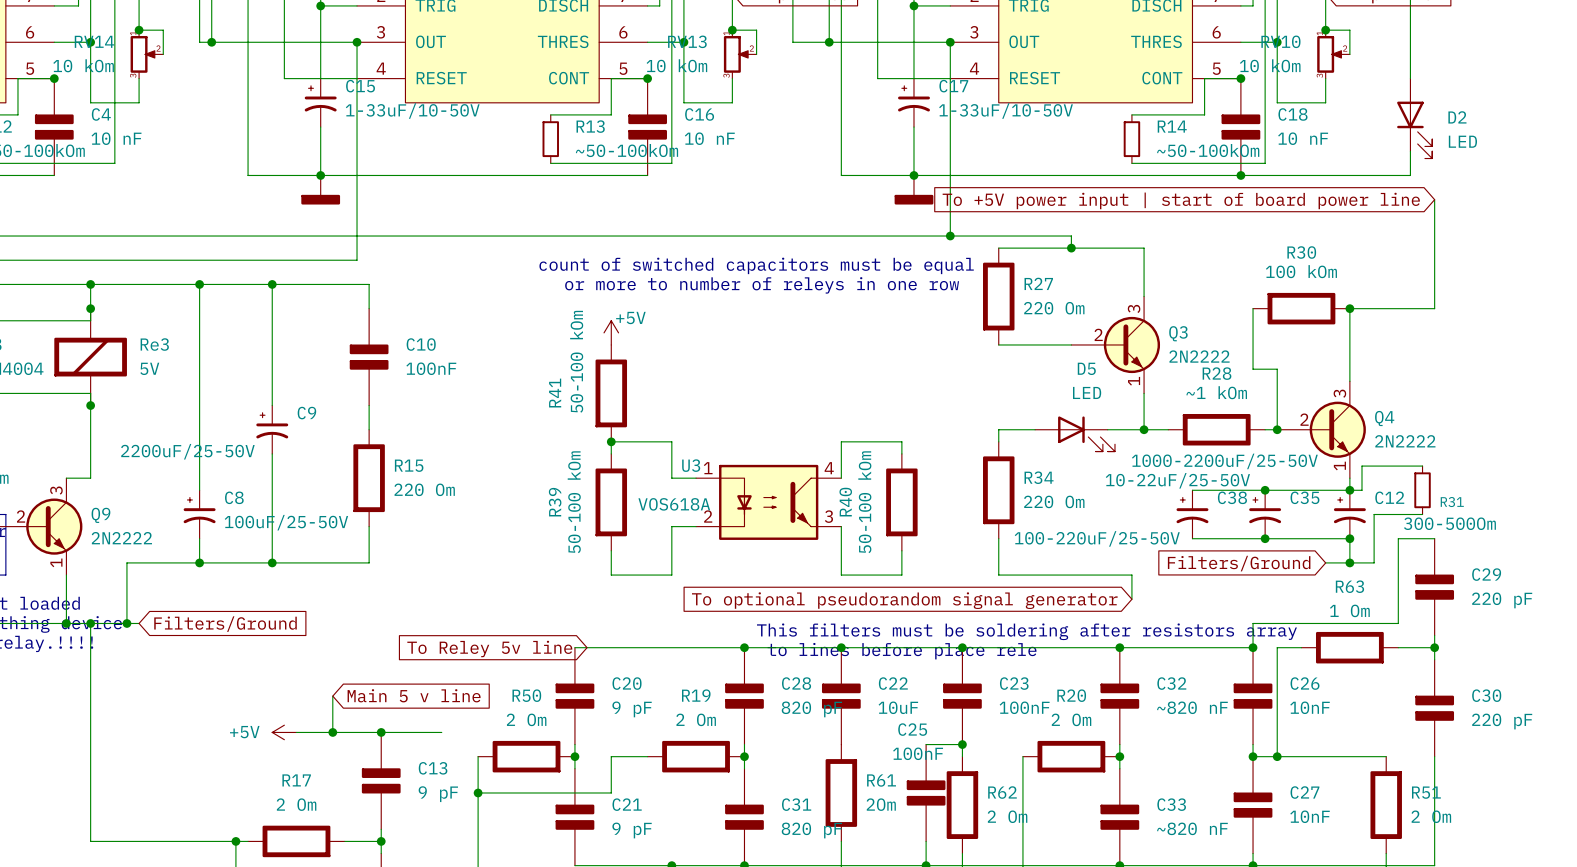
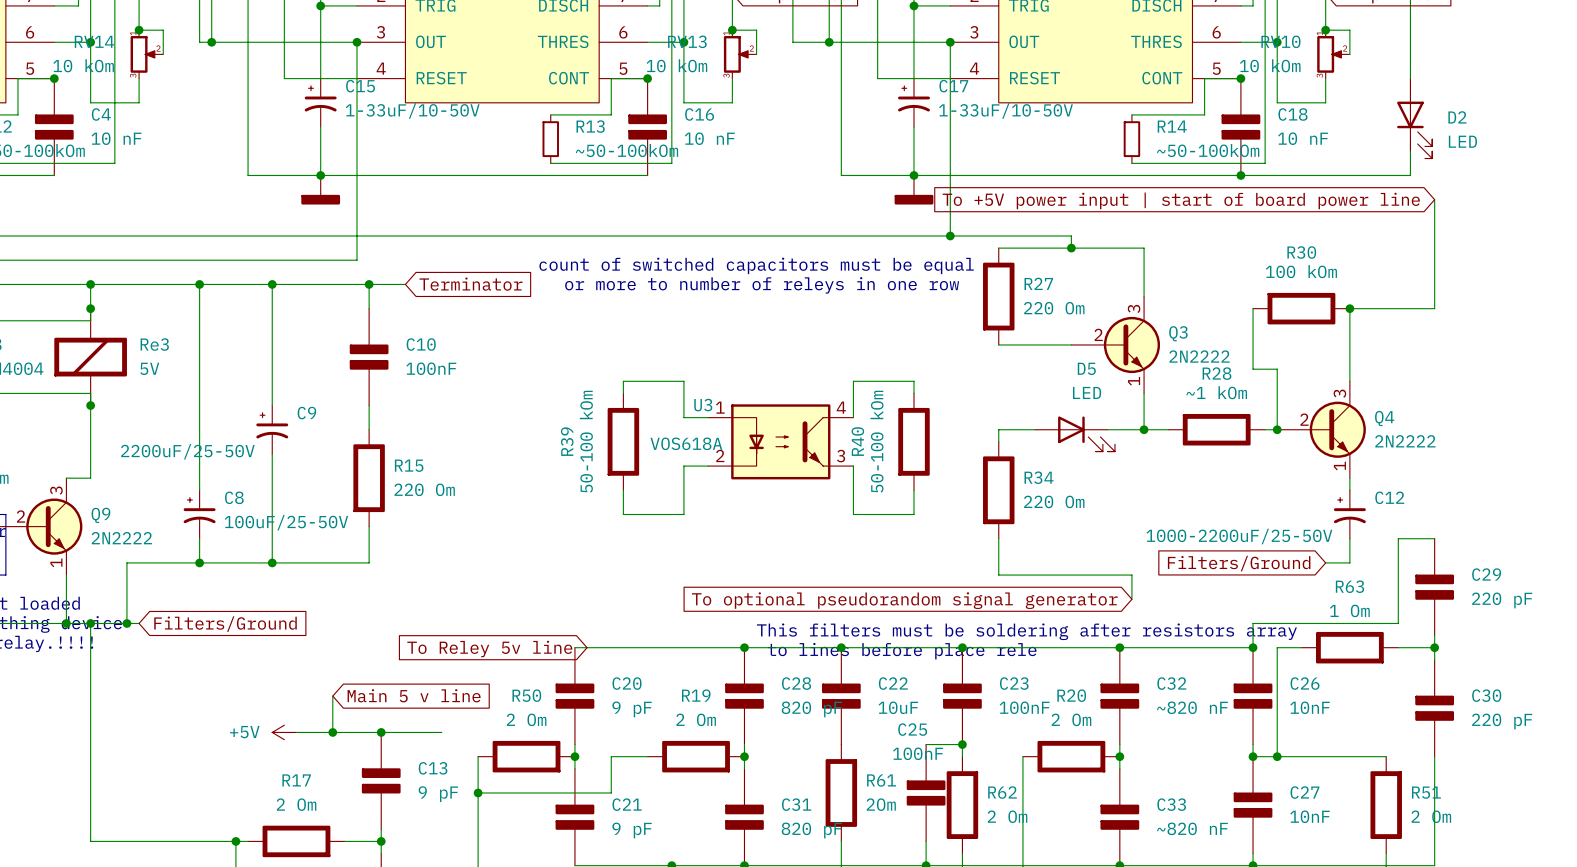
wire: none -> (369, 284) (405, 284)
junction: none -> (369, 284)
global label: none -> Terminator (470, 284)
power symbol: +5V (611, 332) -> none
R41: 50-100 kOm (611, 393) -> none
junction: (611, 441) -> none
wire: (611, 453) (611, 441) (671, 441) (671, 478) (696, 478) -> (623, 393) (623, 381) (683, 381) (683, 417) (708, 417)
wire: (901, 453) (901, 441) (841, 441) (841, 478) -> (913, 393) (913, 381) (853, 381) (853, 417)
C12 text position: 1000-2200uF/25-50V (1224, 461) -> 1000-2200uF/25-50V (1239, 536)
wire: (1422, 466) (1361, 466) (1361, 490) (1192, 490) -> none
junction: (1265, 490) -> none
junction: (1349, 490) -> none
R31: 300-500Om (1422, 490) -> none
R39 position: (611, 502) -> (623, 441)
U3 position: (768, 502) -> (780, 441)
R40 position: (901, 502) -> (913, 441)
C38: (1192, 514) -> none
C35: (1265, 514) -> none
wire: (1422, 514) (1374, 514) (1374, 562) (1349, 562) -> none
wire: (696, 526) (671, 526) (671, 575) (611, 575) (611, 550) -> (708, 466) (683, 466) (683, 514) (623, 514) (623, 490)
wire: (841, 526) (841, 575) (901, 575) (901, 550) -> (853, 466) (853, 514) (913, 514) (913, 490)
wire: (1192, 538) (1349, 538) -> none
junction: (1265, 538) -> none
junction: (1349, 538) -> none
junction: (1349, 562) -> none

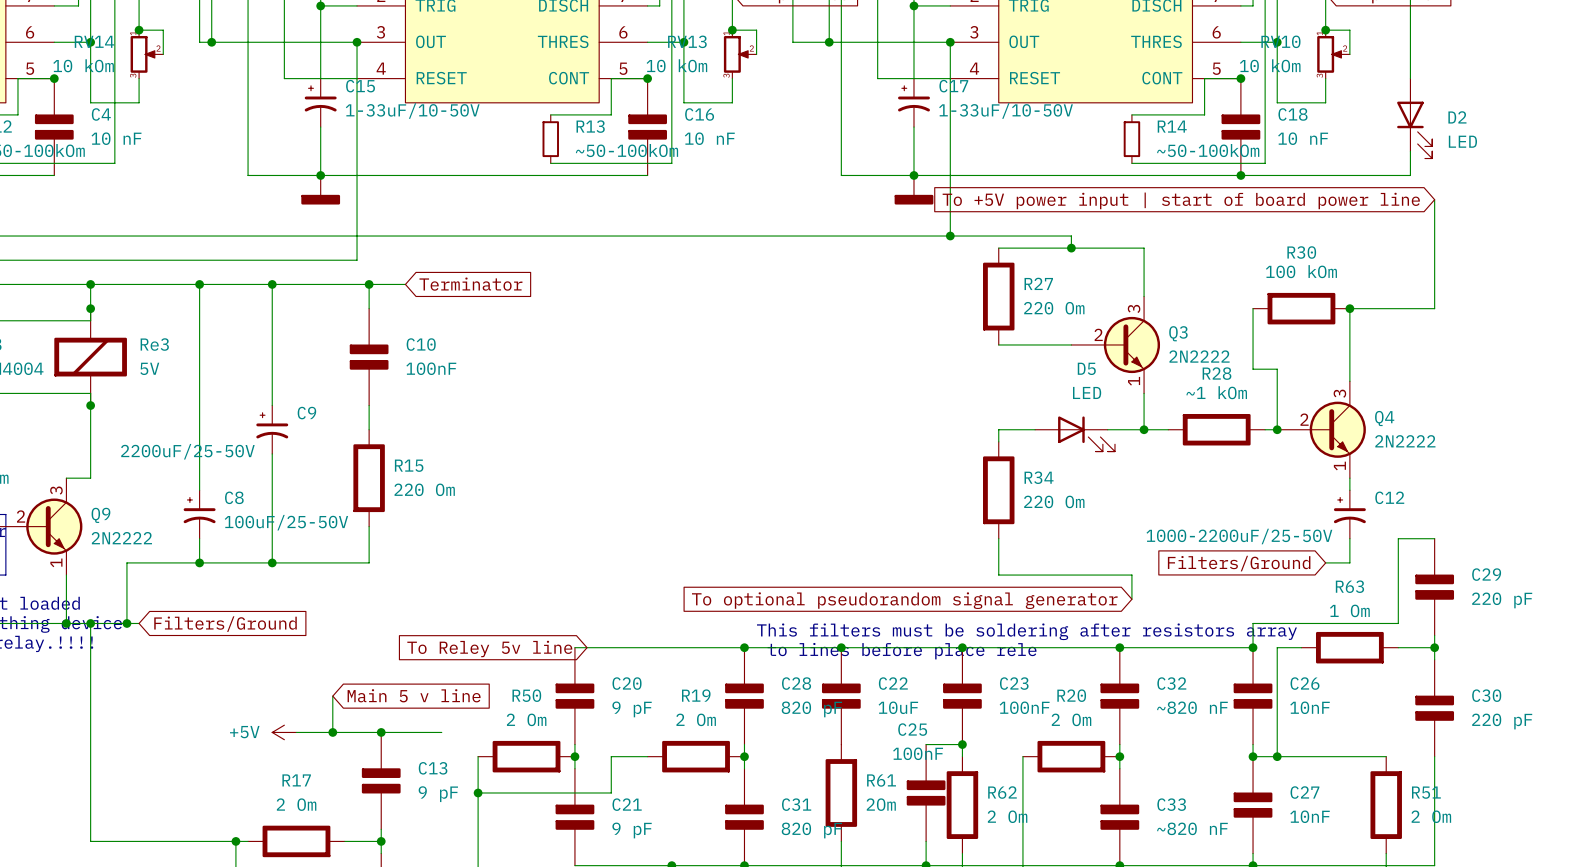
text: count of switched capacitors must be equal (756, 265) -> none
text: or more to number of releys in one row (762, 285) -> none
wire: (623, 393) (623, 381) (683, 381) (683, 417) (708, 417) -> none
wire: (913, 393) (913, 381) (853, 381) (853, 417) -> none
R39: 50-100 kOm (623, 441) -> none
U3: VOS618A (780, 441) -> none
R40: 50-100 kOm (913, 441) -> none
wire: (708, 466) (683, 466) (683, 514) (623, 514) (623, 490) -> none
wire: (853, 466) (853, 514) (913, 514) (913, 490) -> none

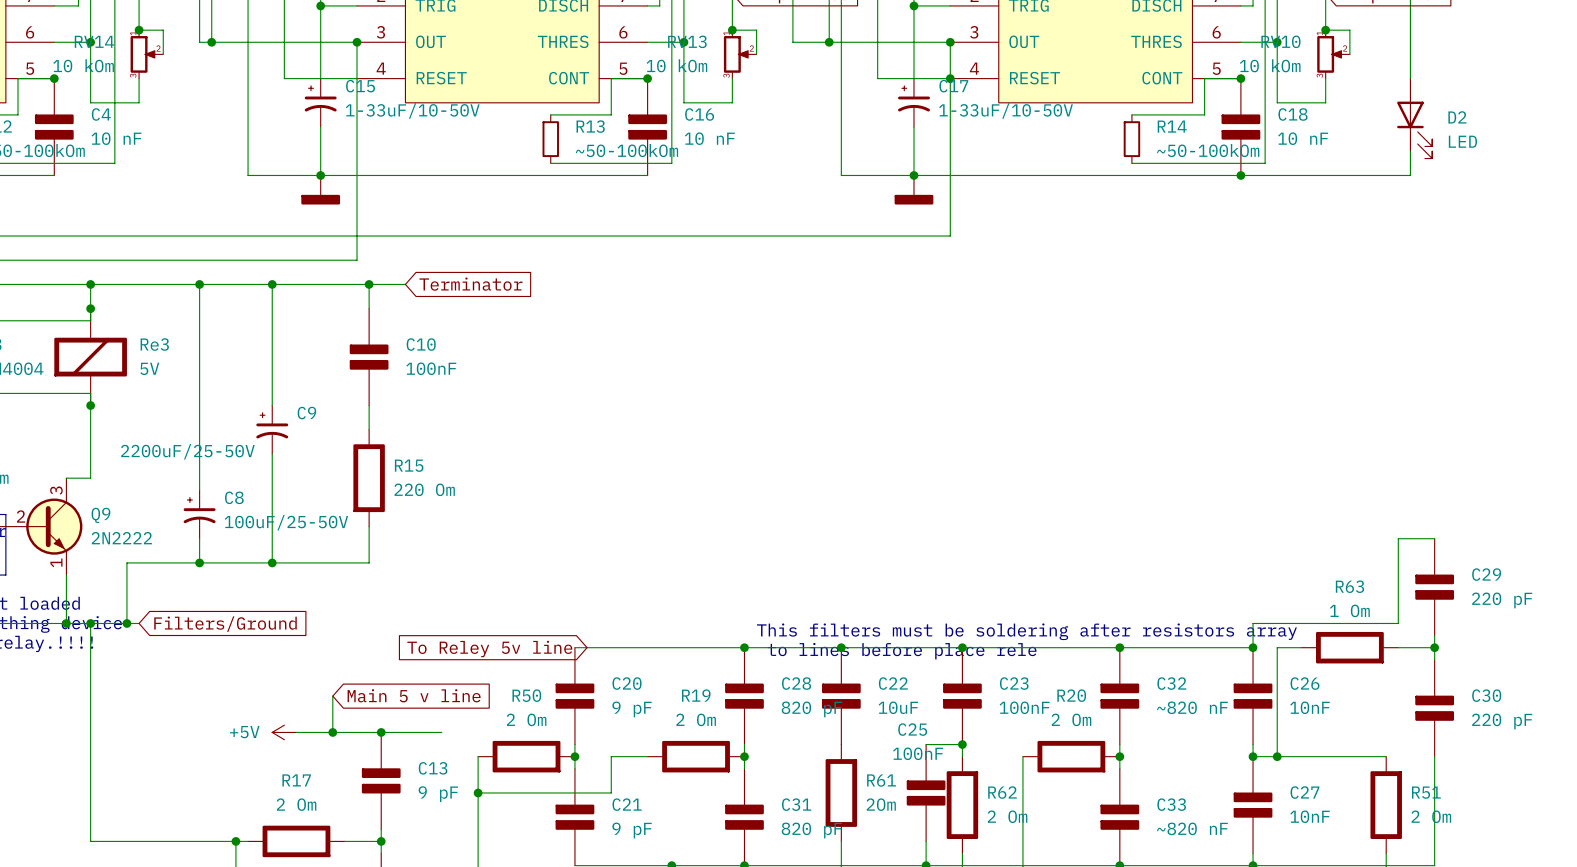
junction: none -> (950, 78)
wire: (1434, 199) (1434, 308) (1349, 308) (1349, 381) -> none
global label: To +5V power input | start of board power line (1181, 200) -> none
wire: (950, 236) (1071, 236) (1071, 248) -> none
junction: (950, 236) -> none
wire: (998, 248) (1144, 248) (1144, 296) -> none
junction: (1071, 248) -> none
R27: 220 Om (998, 296) -> none
wire: (1253, 308) (1253, 369) (1277, 369) (1277, 429) (1265, 429) -> none
R30: 100 kOm (1301, 308) -> none
junction: (1349, 308) -> none
wire: (998, 344) (1071, 344) -> none
Q3: 2N2222 (1115, 344) -> none
wire: (1144, 393) (1144, 429) -> none
wire: (1035, 429) (998, 429) (998, 441) -> none
wire: (1107, 429) (1168, 429) -> none
junction: (1144, 429) -> none
R28: ~1 kOm (1216, 429) -> none
junction: (1277, 429) -> none
Q4: 2N2222 (1321, 429) -> none
D5: LED (1075, 433) -> none
wire: (1349, 478) (1349, 490) -> none
R34: 220 Om (998, 490) -> none
C12: (1349, 514) -> none
wire: (998, 538) (998, 575) (1131, 575) (1131, 599) -> none
wire: (1349, 538) (1349, 562) (1325, 562) -> none
global label: Filters/Ground (1239, 563) -> none
global label: To optional pseudorandom signal generator (904, 600) -> none

